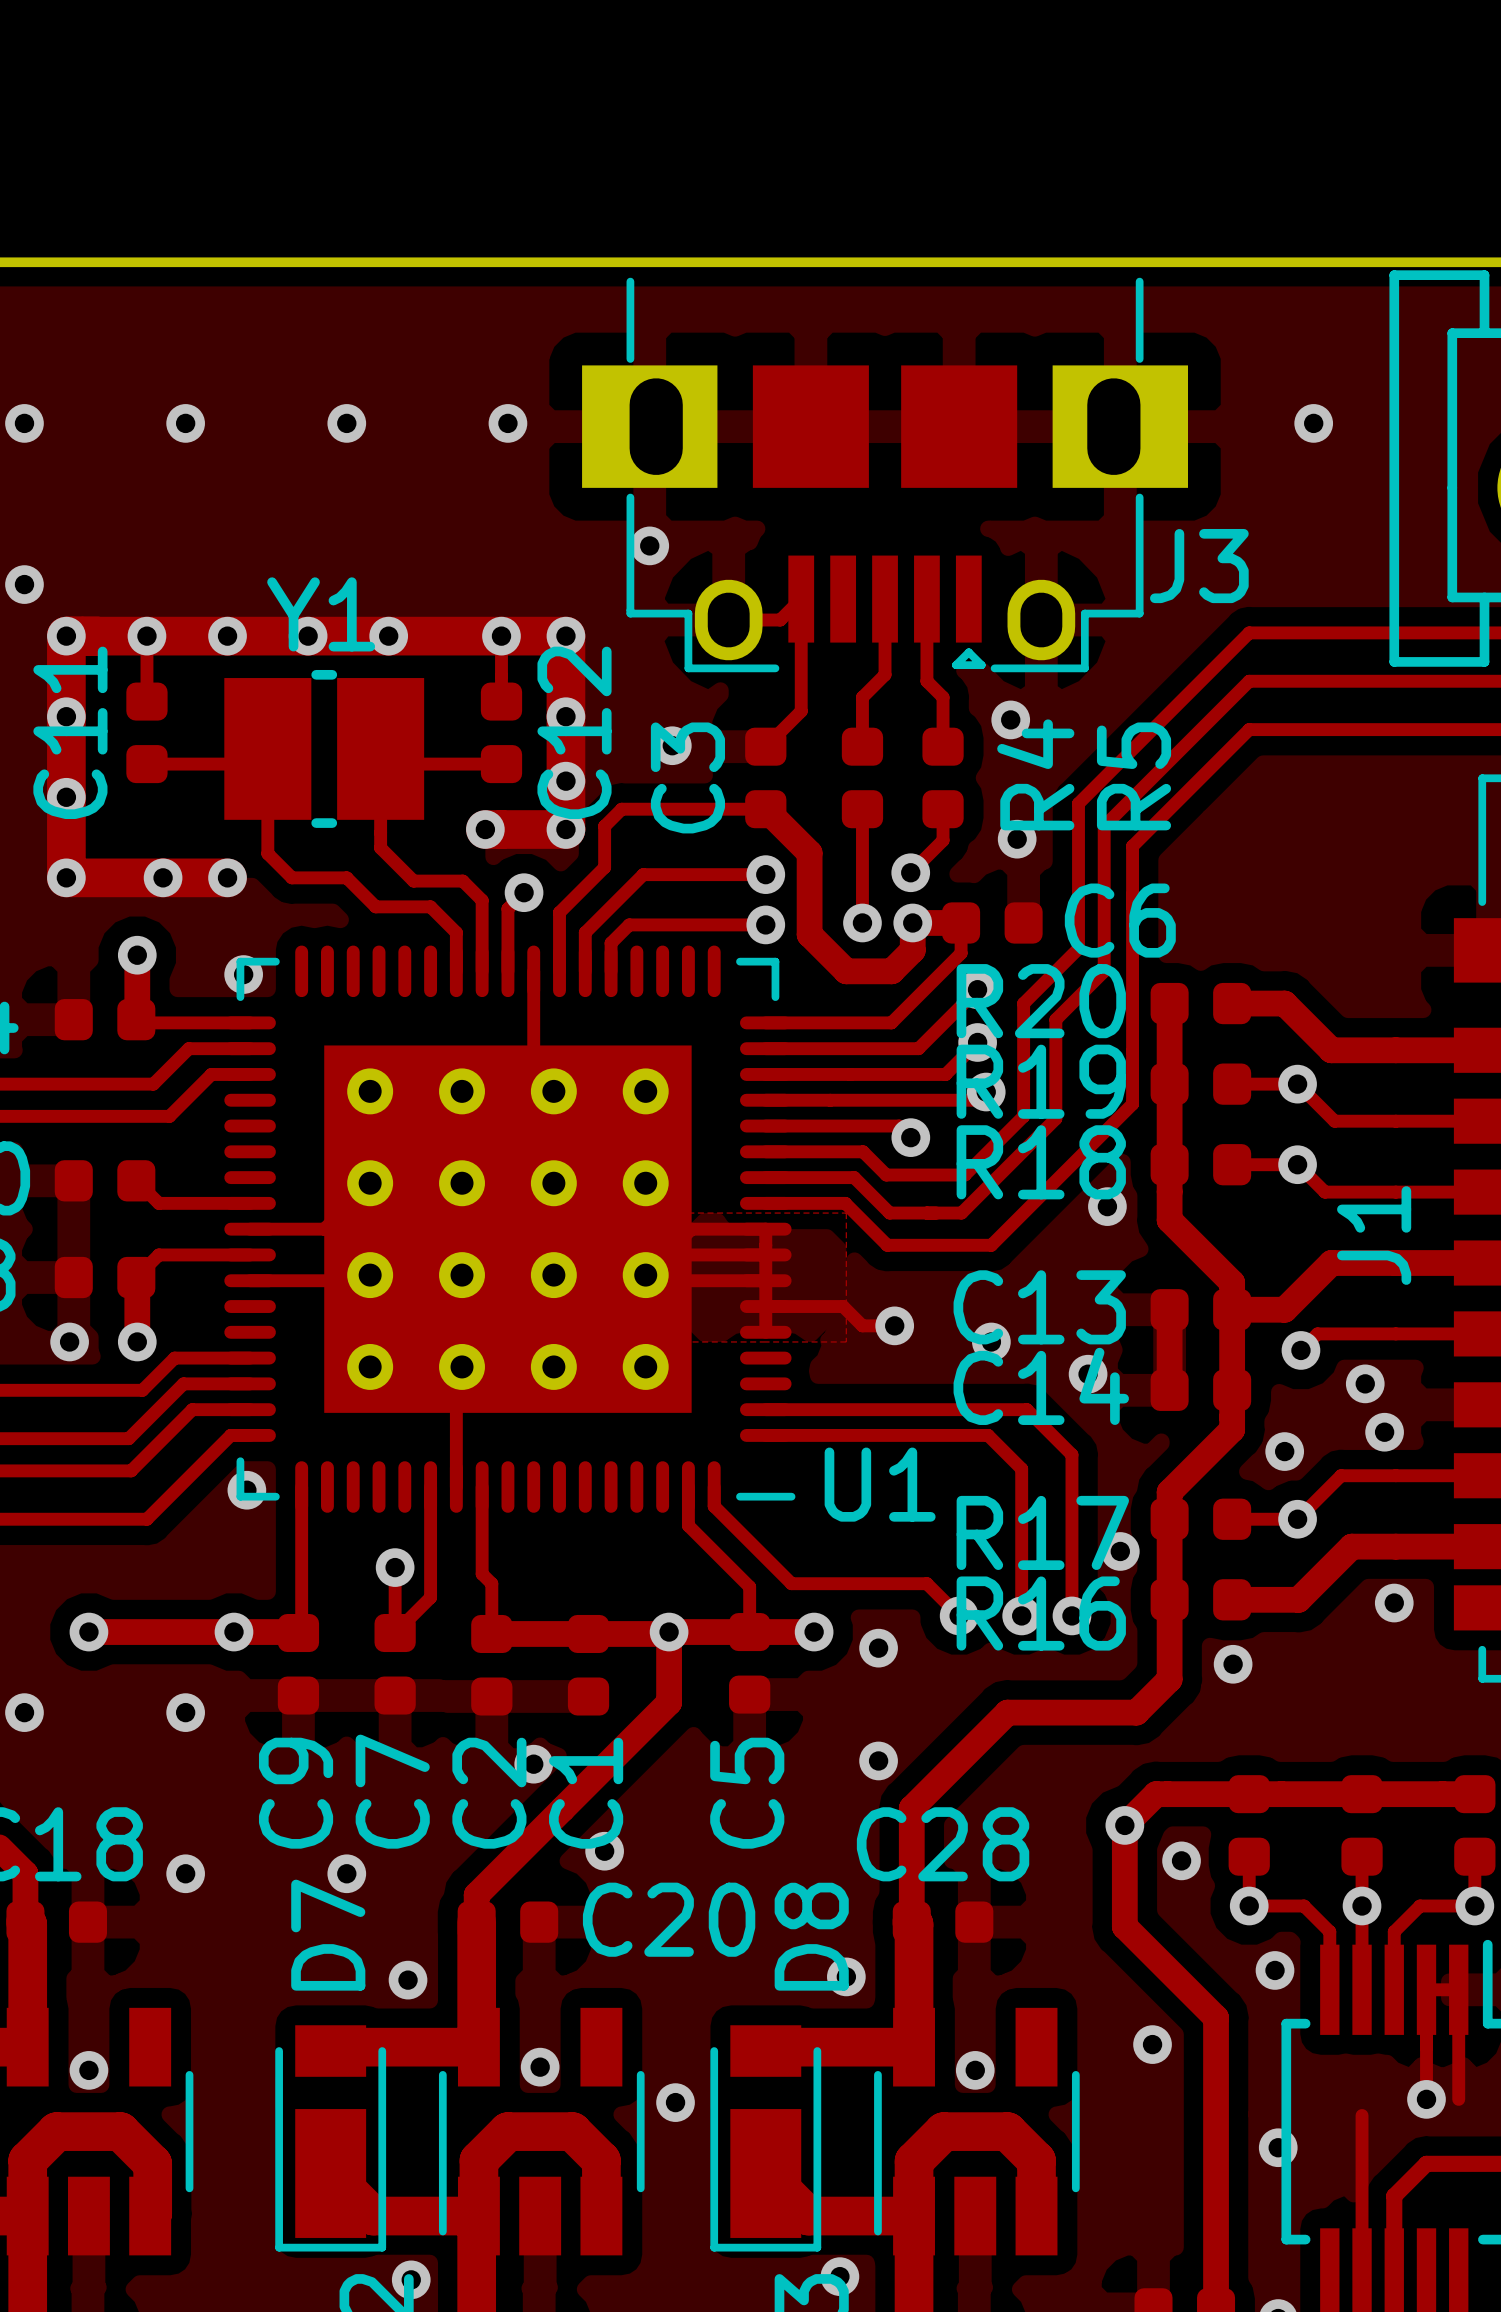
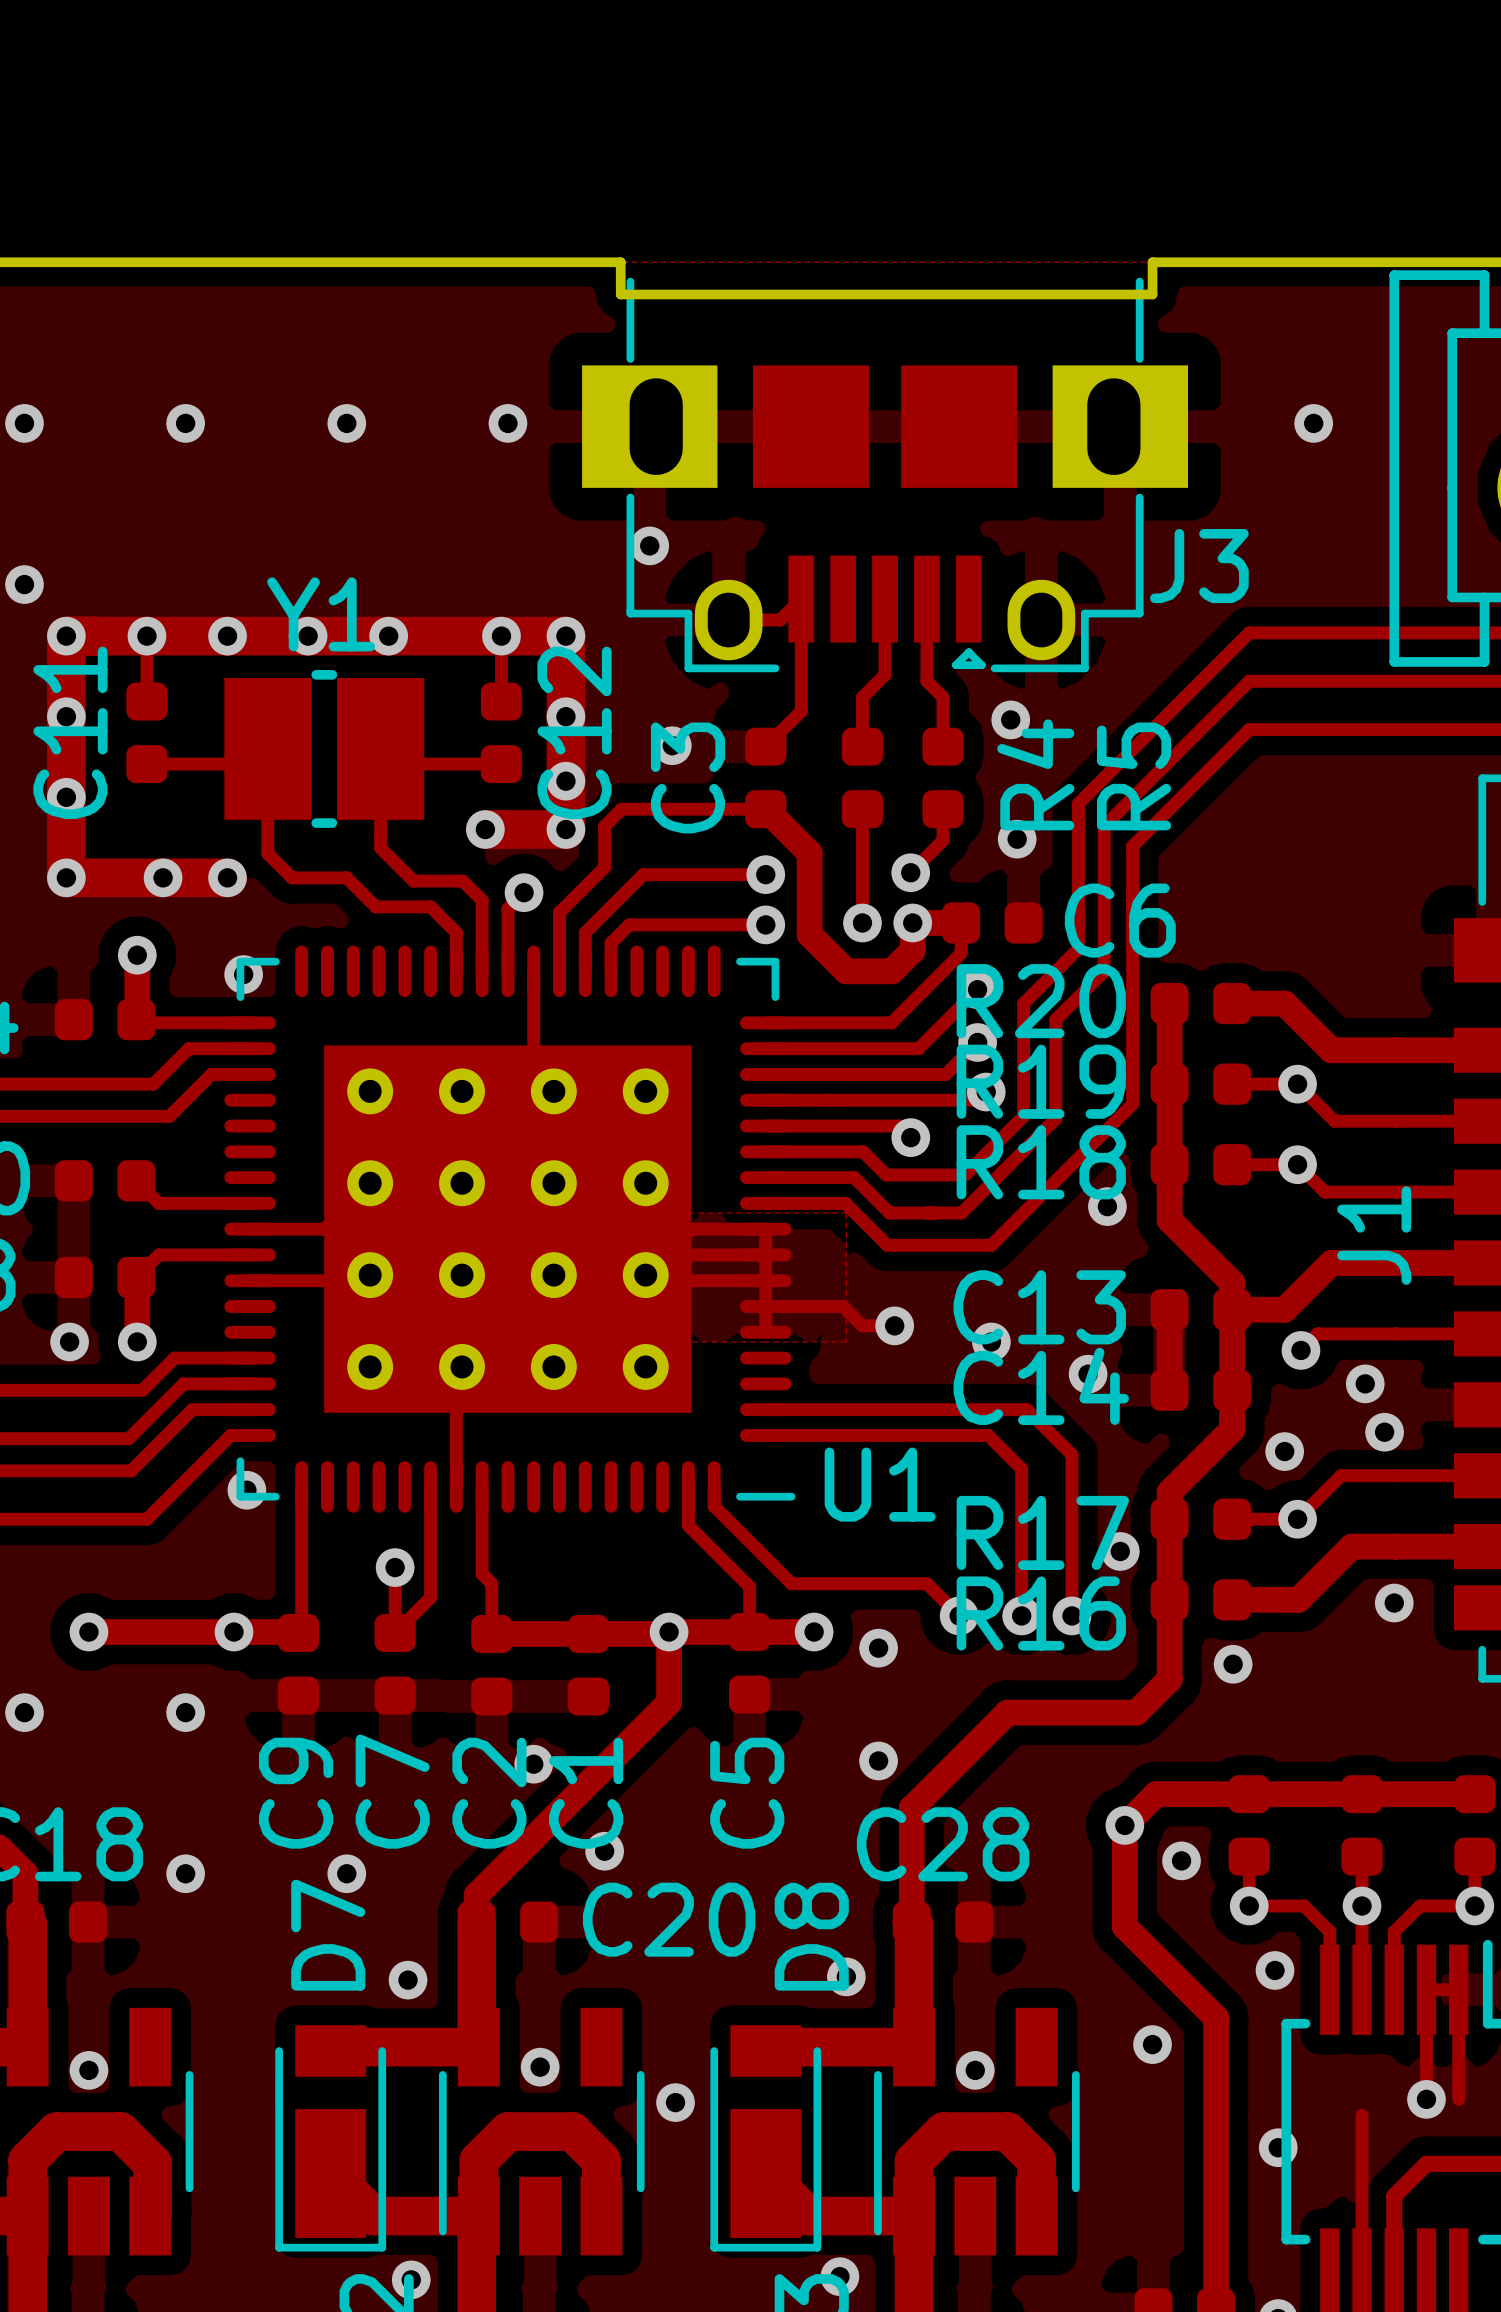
board edge: (620, 262) (1152, 262) -> (620, 262) (620, 294) (1152, 294) (1152, 262)

